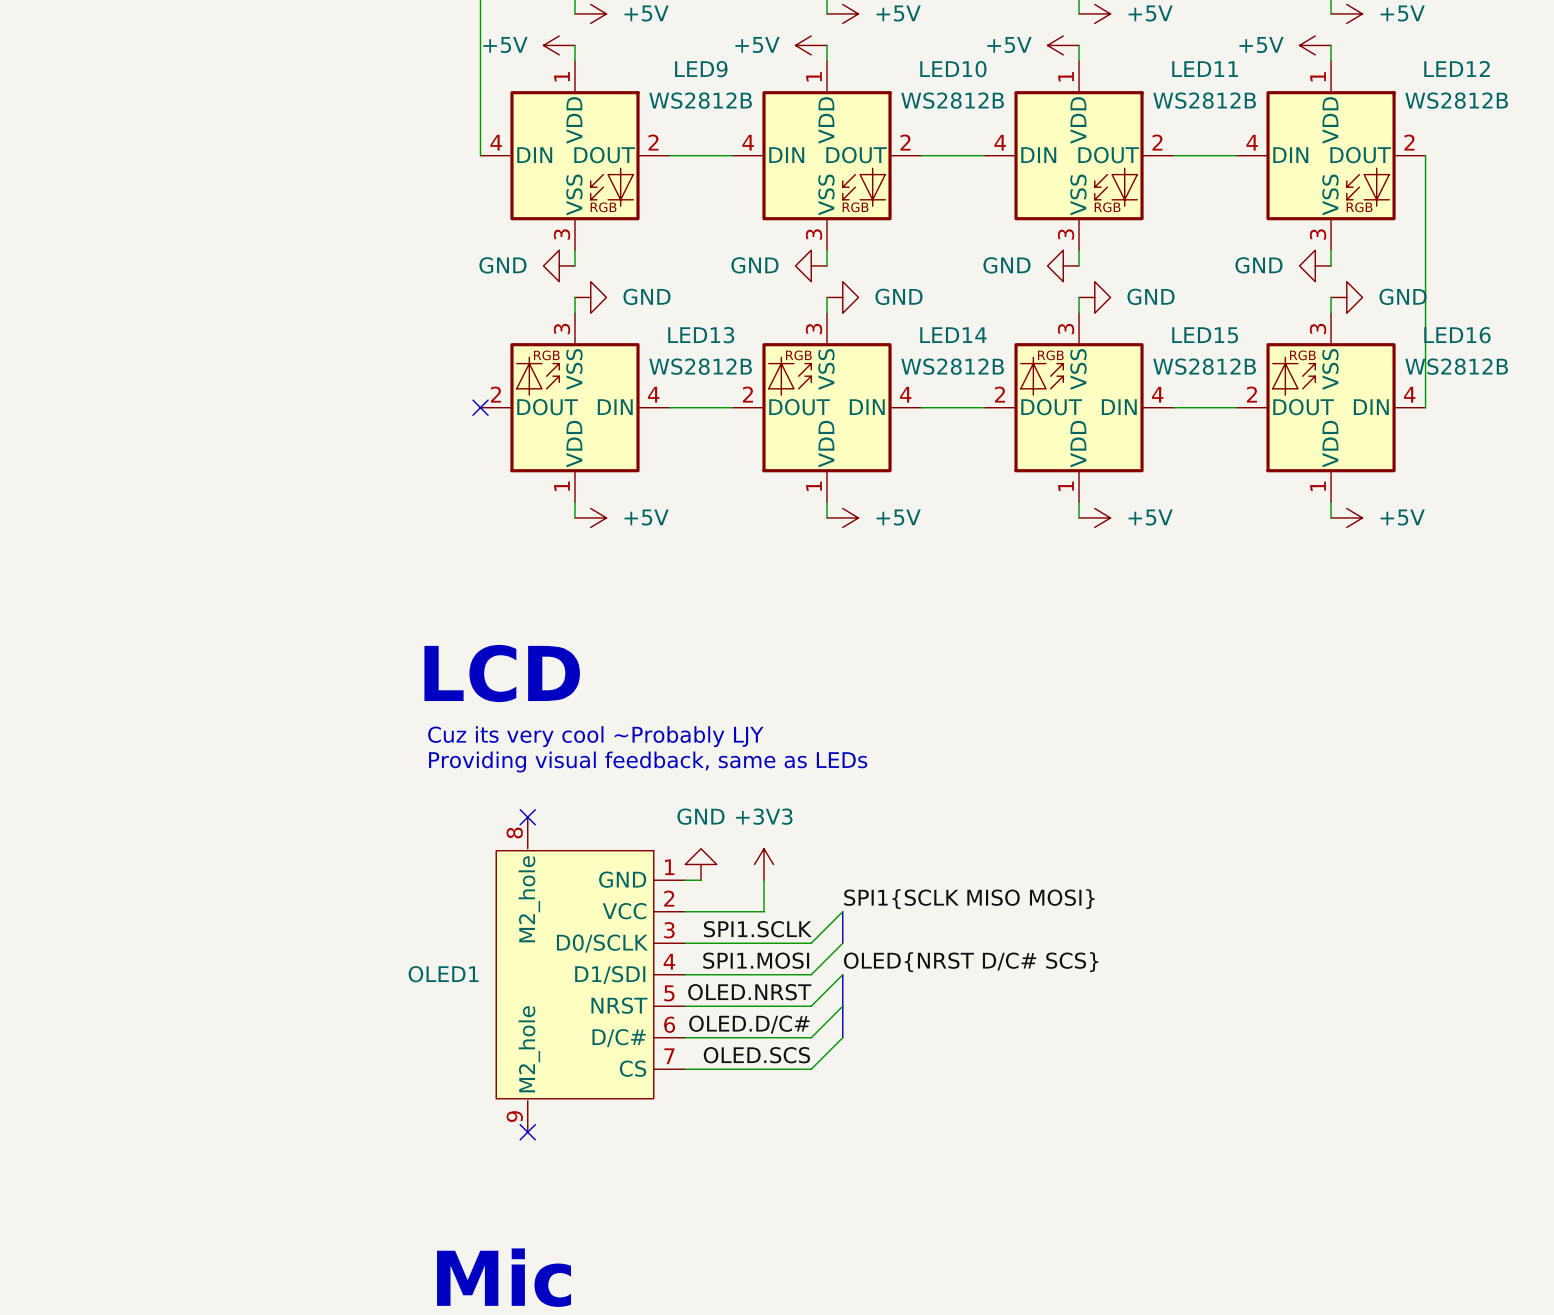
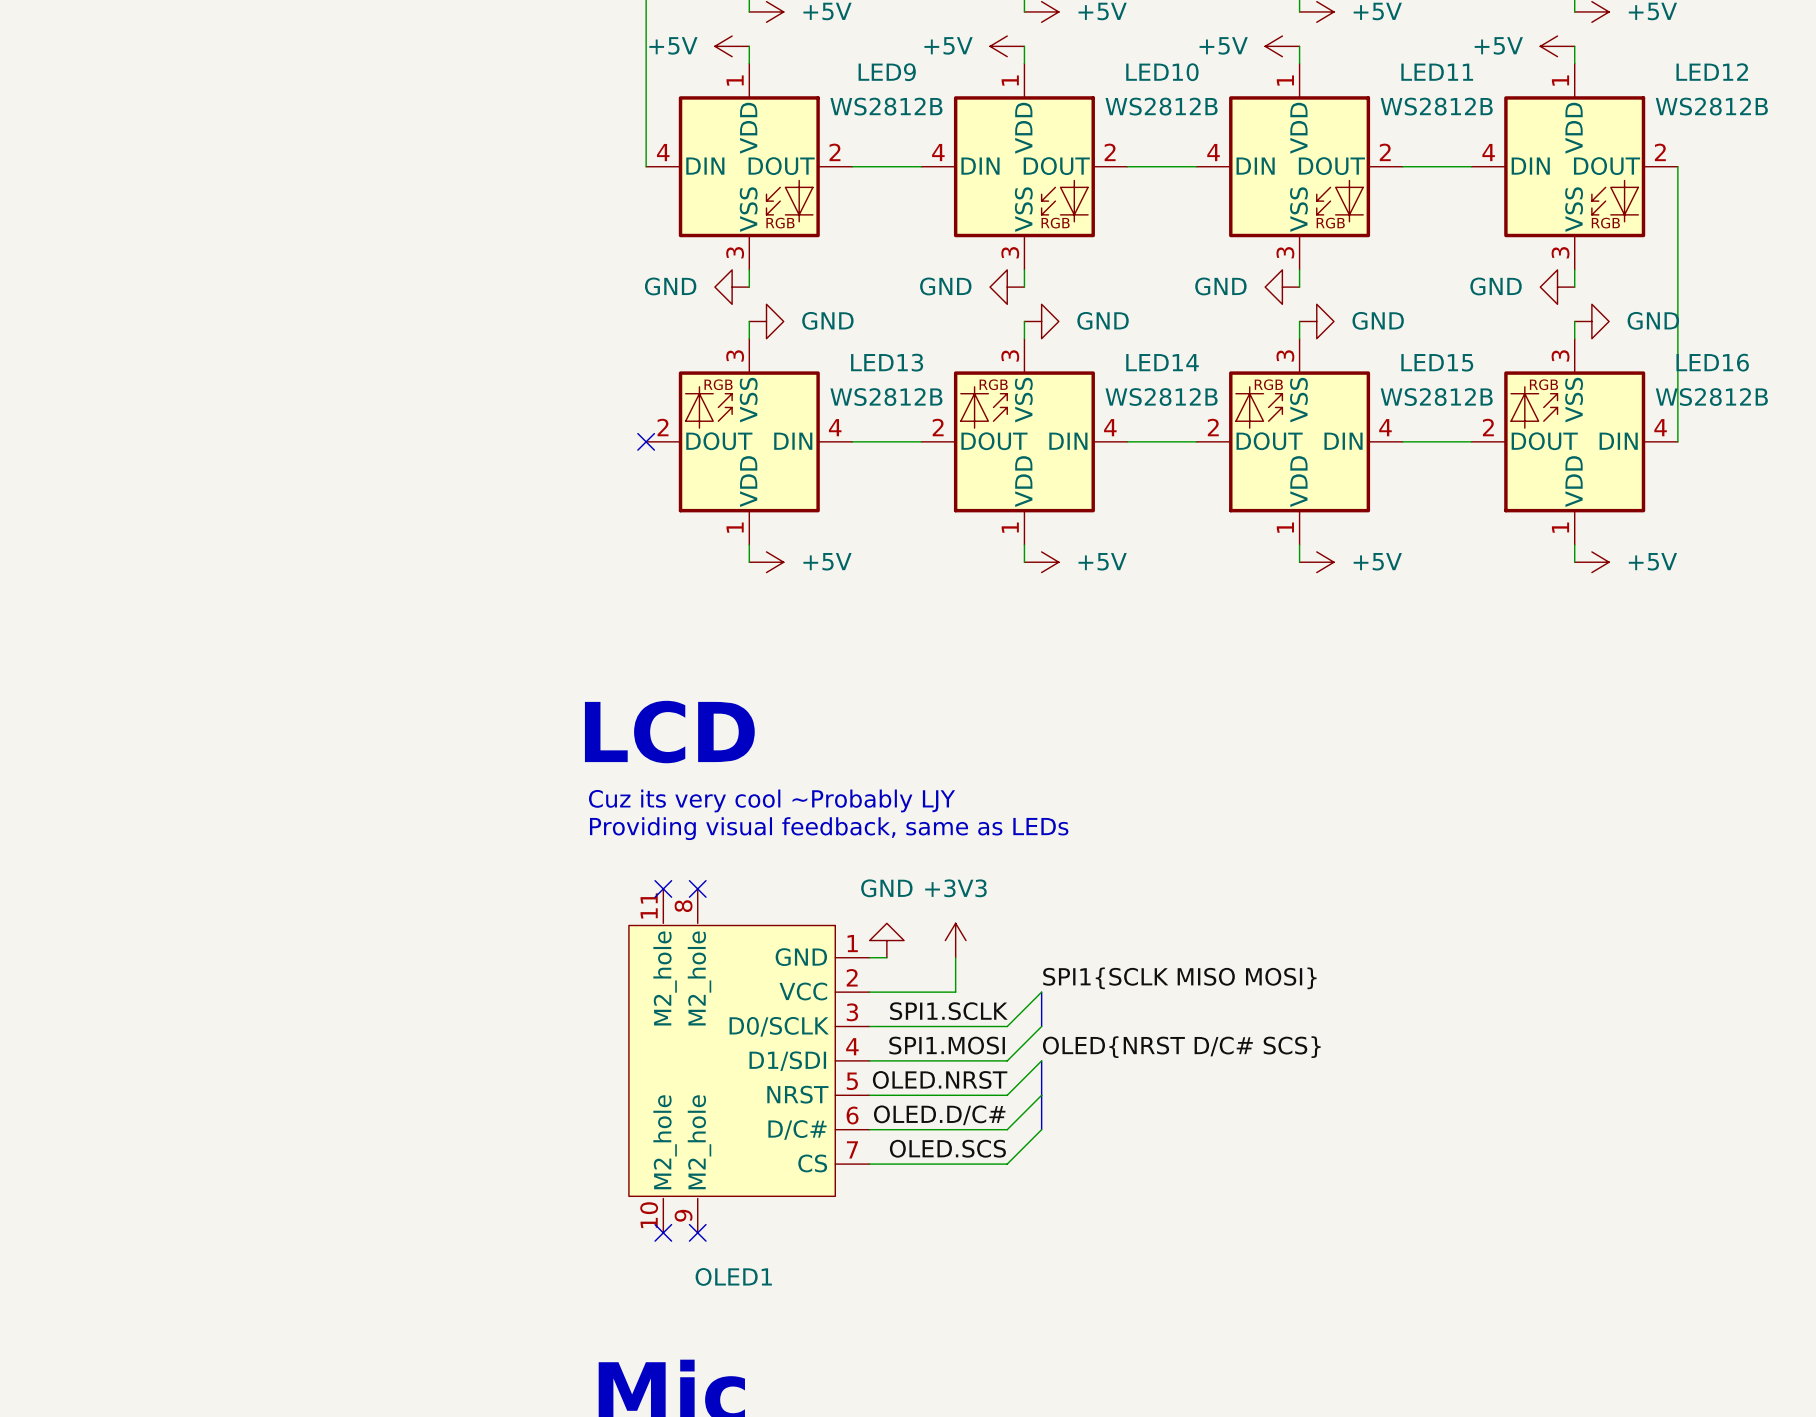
OLED1 symbol: [496, 817, 686, 1133] -> [628, 888, 870, 1233]
no-connect mark: none -> (663, 888)
OLED1 name position: OLED1 (443, 974) -> OLED1 (733, 1276)
no-connect mark: none -> (663, 1232)

